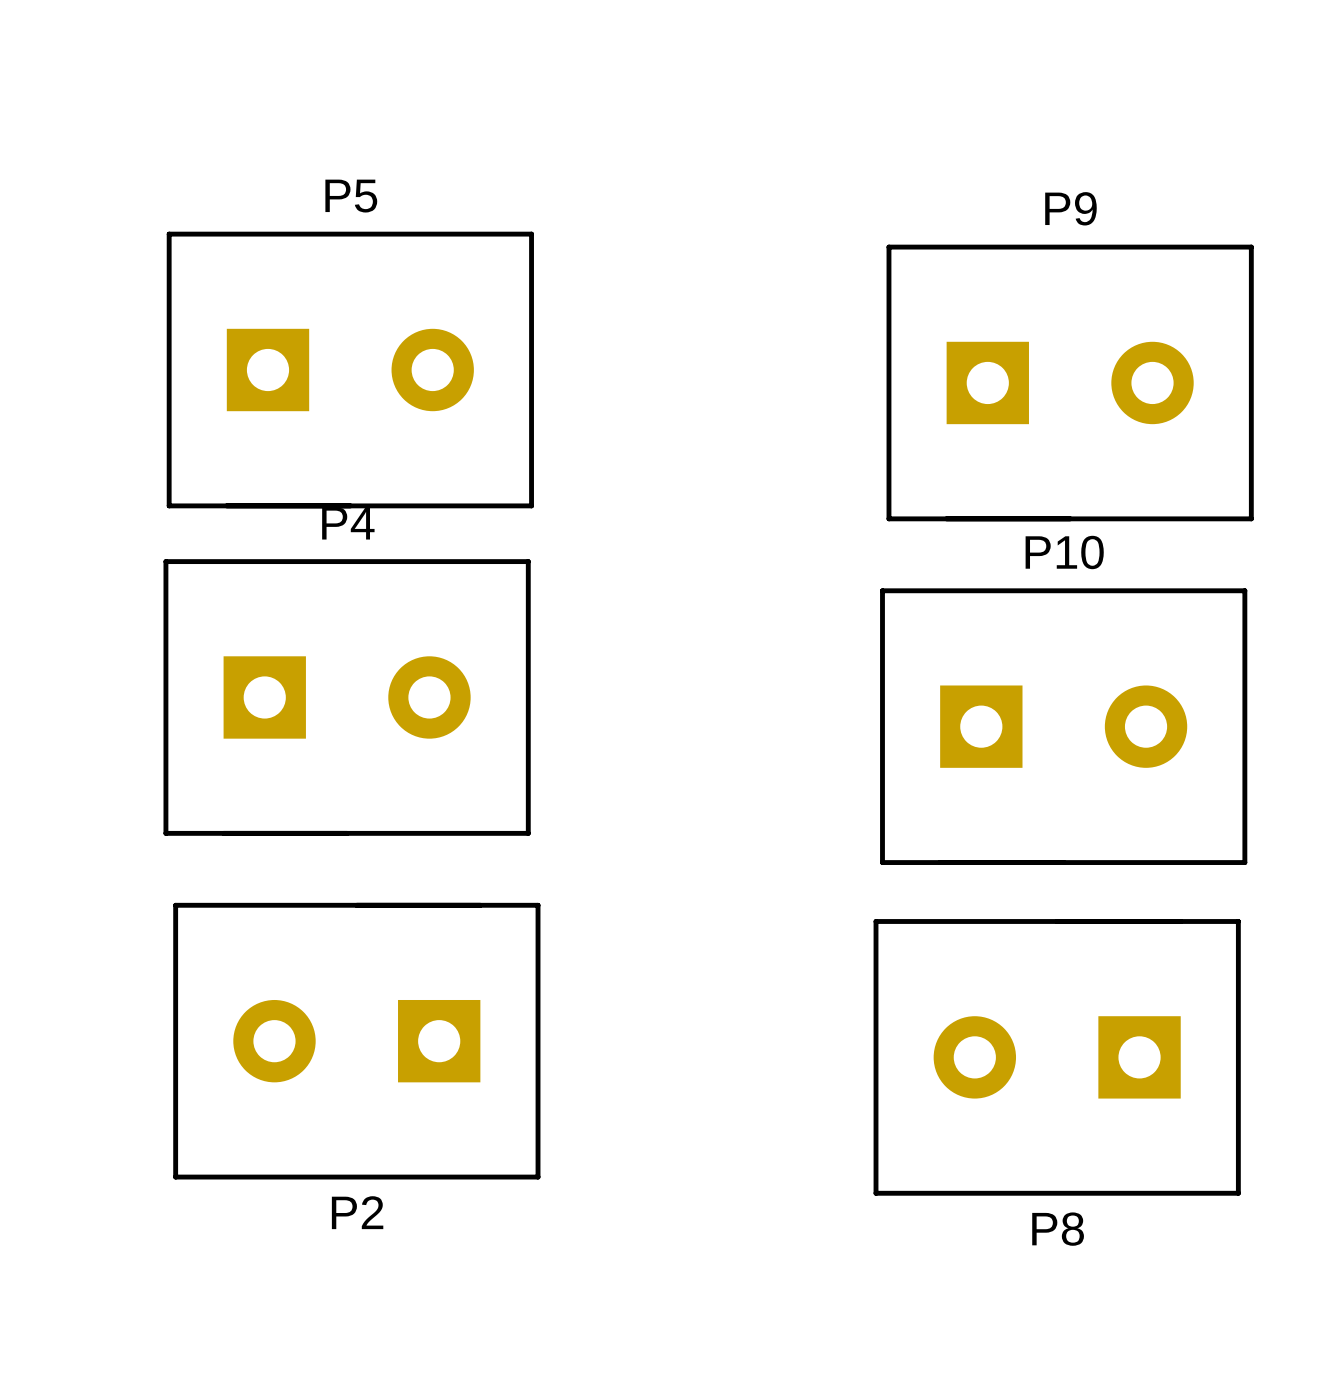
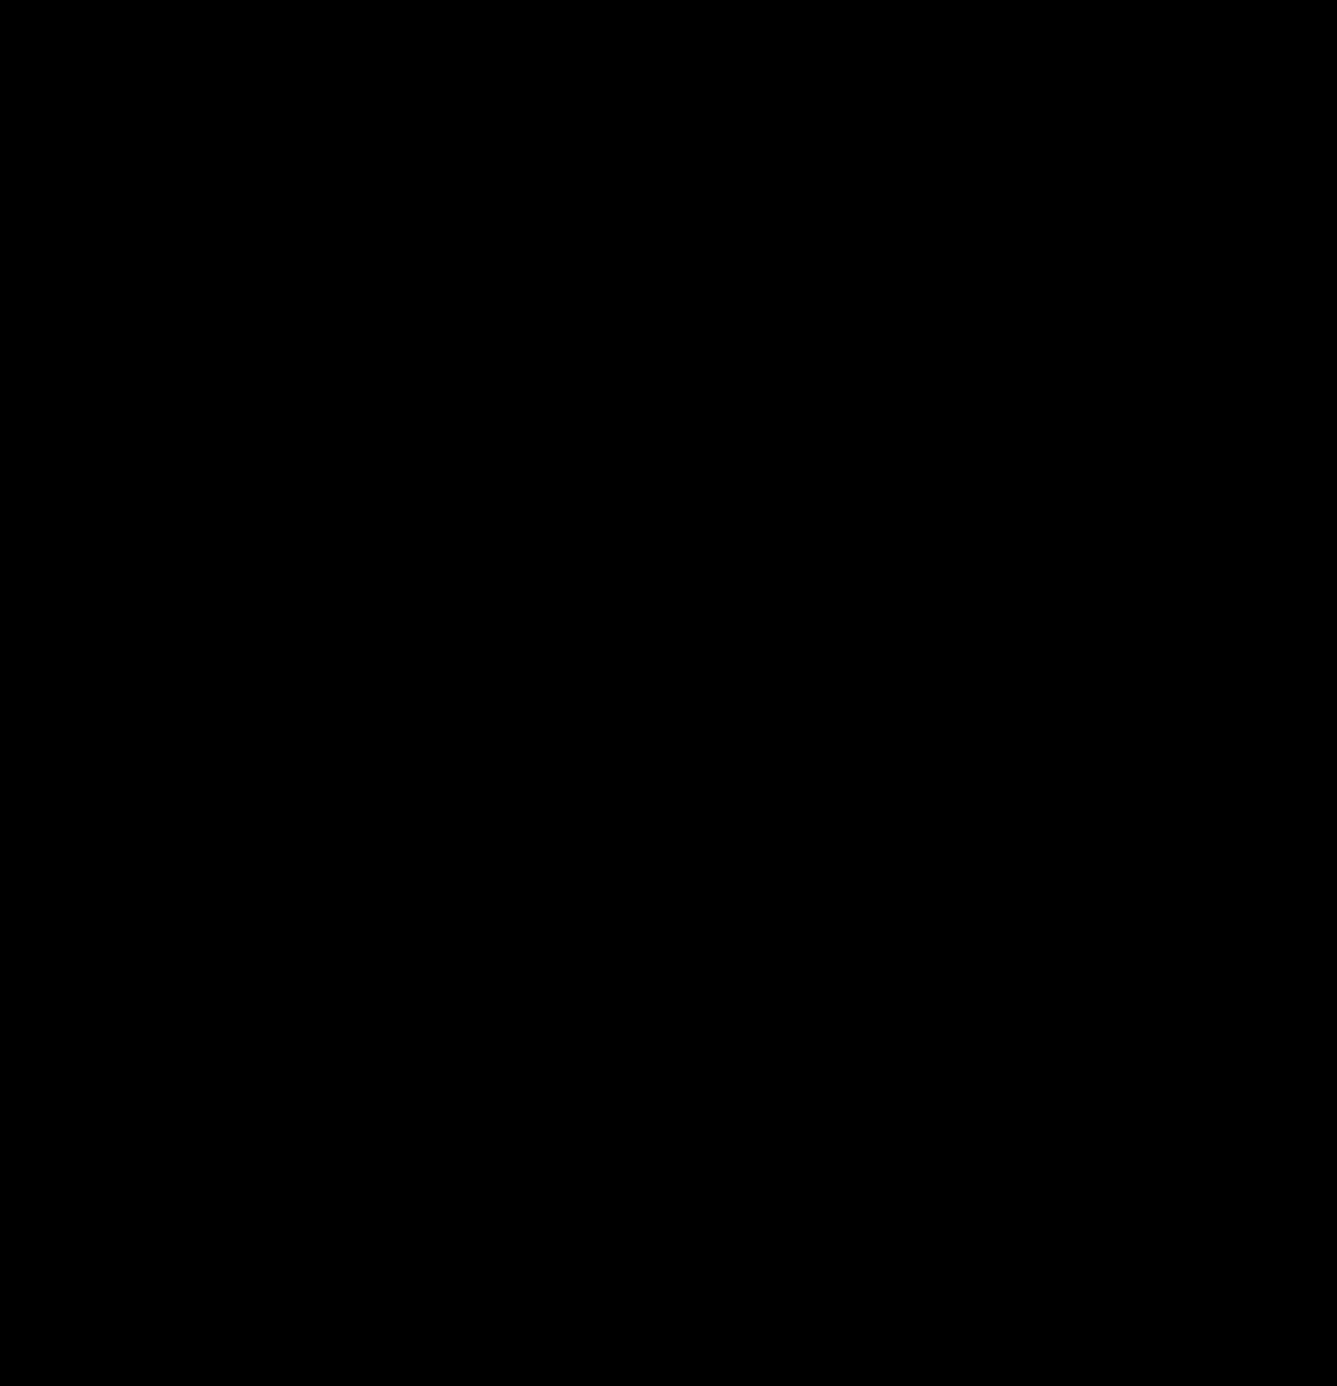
P5: (350, 370) -> none
P9: (1070, 382) -> none
P4: (347, 697) -> none
P10: (1063, 726) -> none
P2: (356, 1041) -> none
P8: (1057, 1057) -> none

